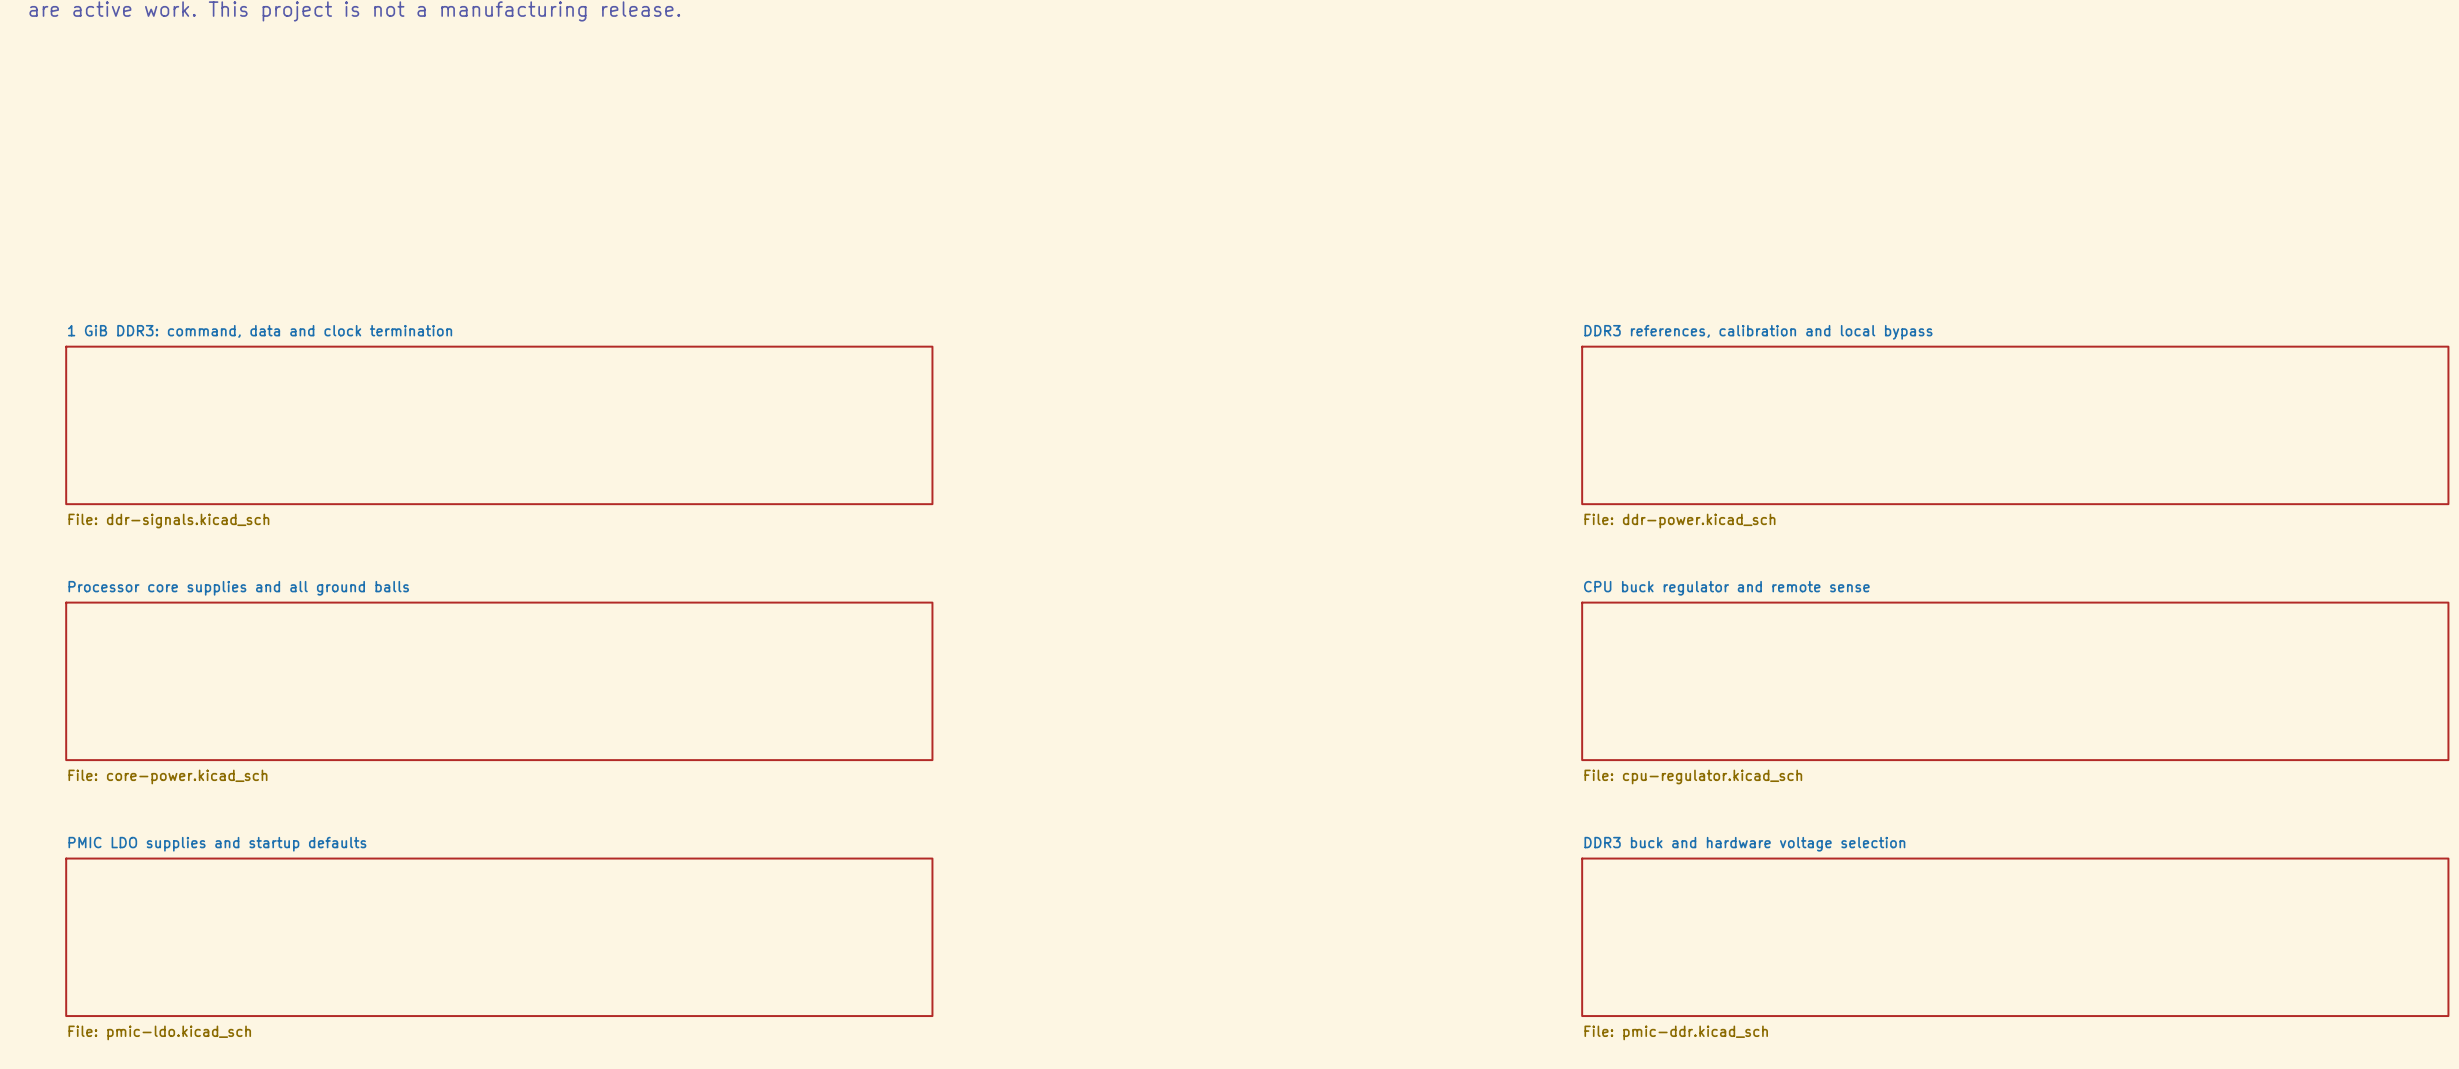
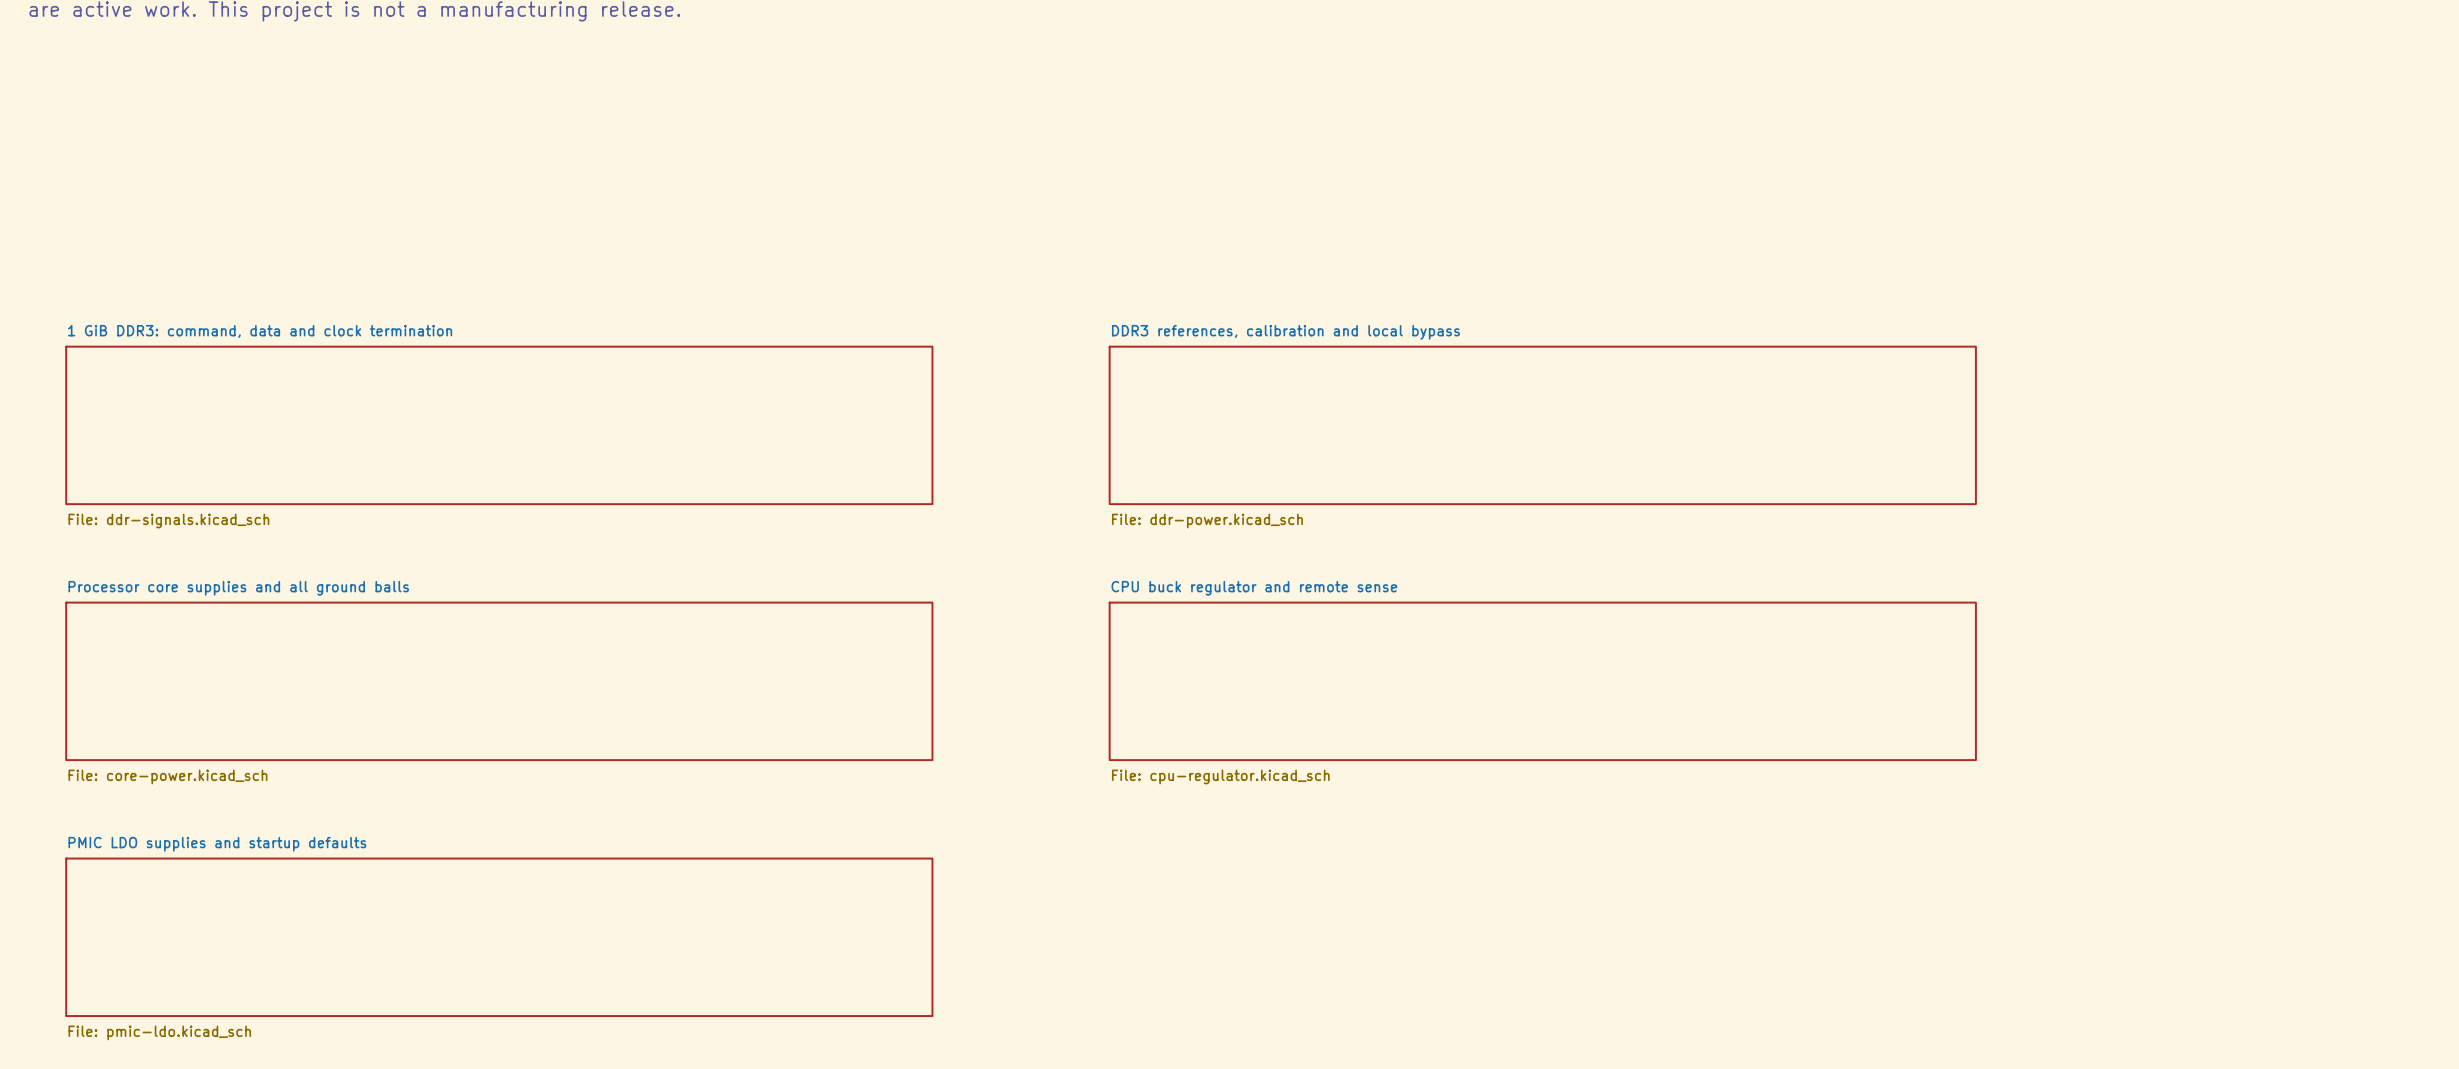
sheet DDR3 references, calibration and local bypass position: (2015, 425) -> (1542, 425)
sheet CPU buck regulator and remote sense: none -> File: cpu-regulator.kicad_sch (1542, 681)
sheet CPU buck regulator and remote sense: File: cpu-regulator.kicad_sch (2015, 681) -> none
sheet DDR3 buck and hardware voltage selection: File: pmic-ddr.kicad_sch (2015, 937) -> none

